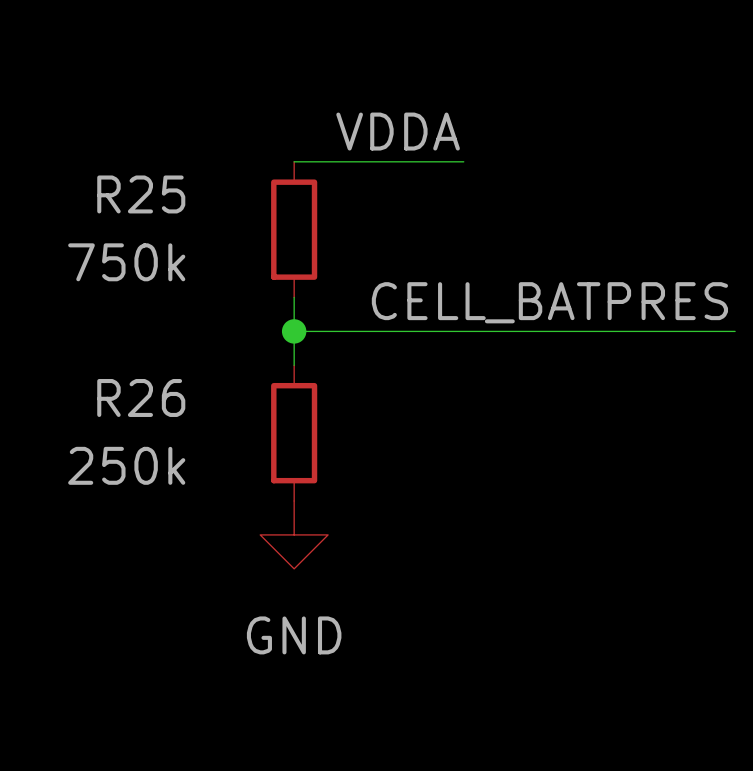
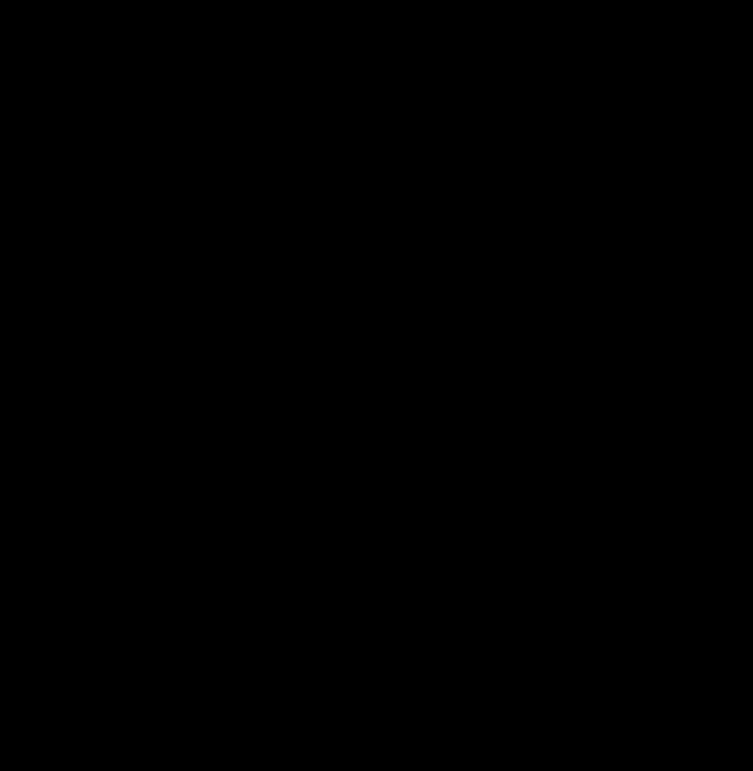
label: VDDA (398, 131) -> none
wire: (294, 161) (463, 161) -> none
R25: 750k (294, 229) -> none
wire: (294, 297) (294, 365) -> none
label: CELL_BATPRES (549, 302) -> none
wire: (294, 331) (735, 331) -> none
junction: (294, 331) -> none
R26: 250k (294, 433) -> none
power symbol: GND (294, 534) -> none

